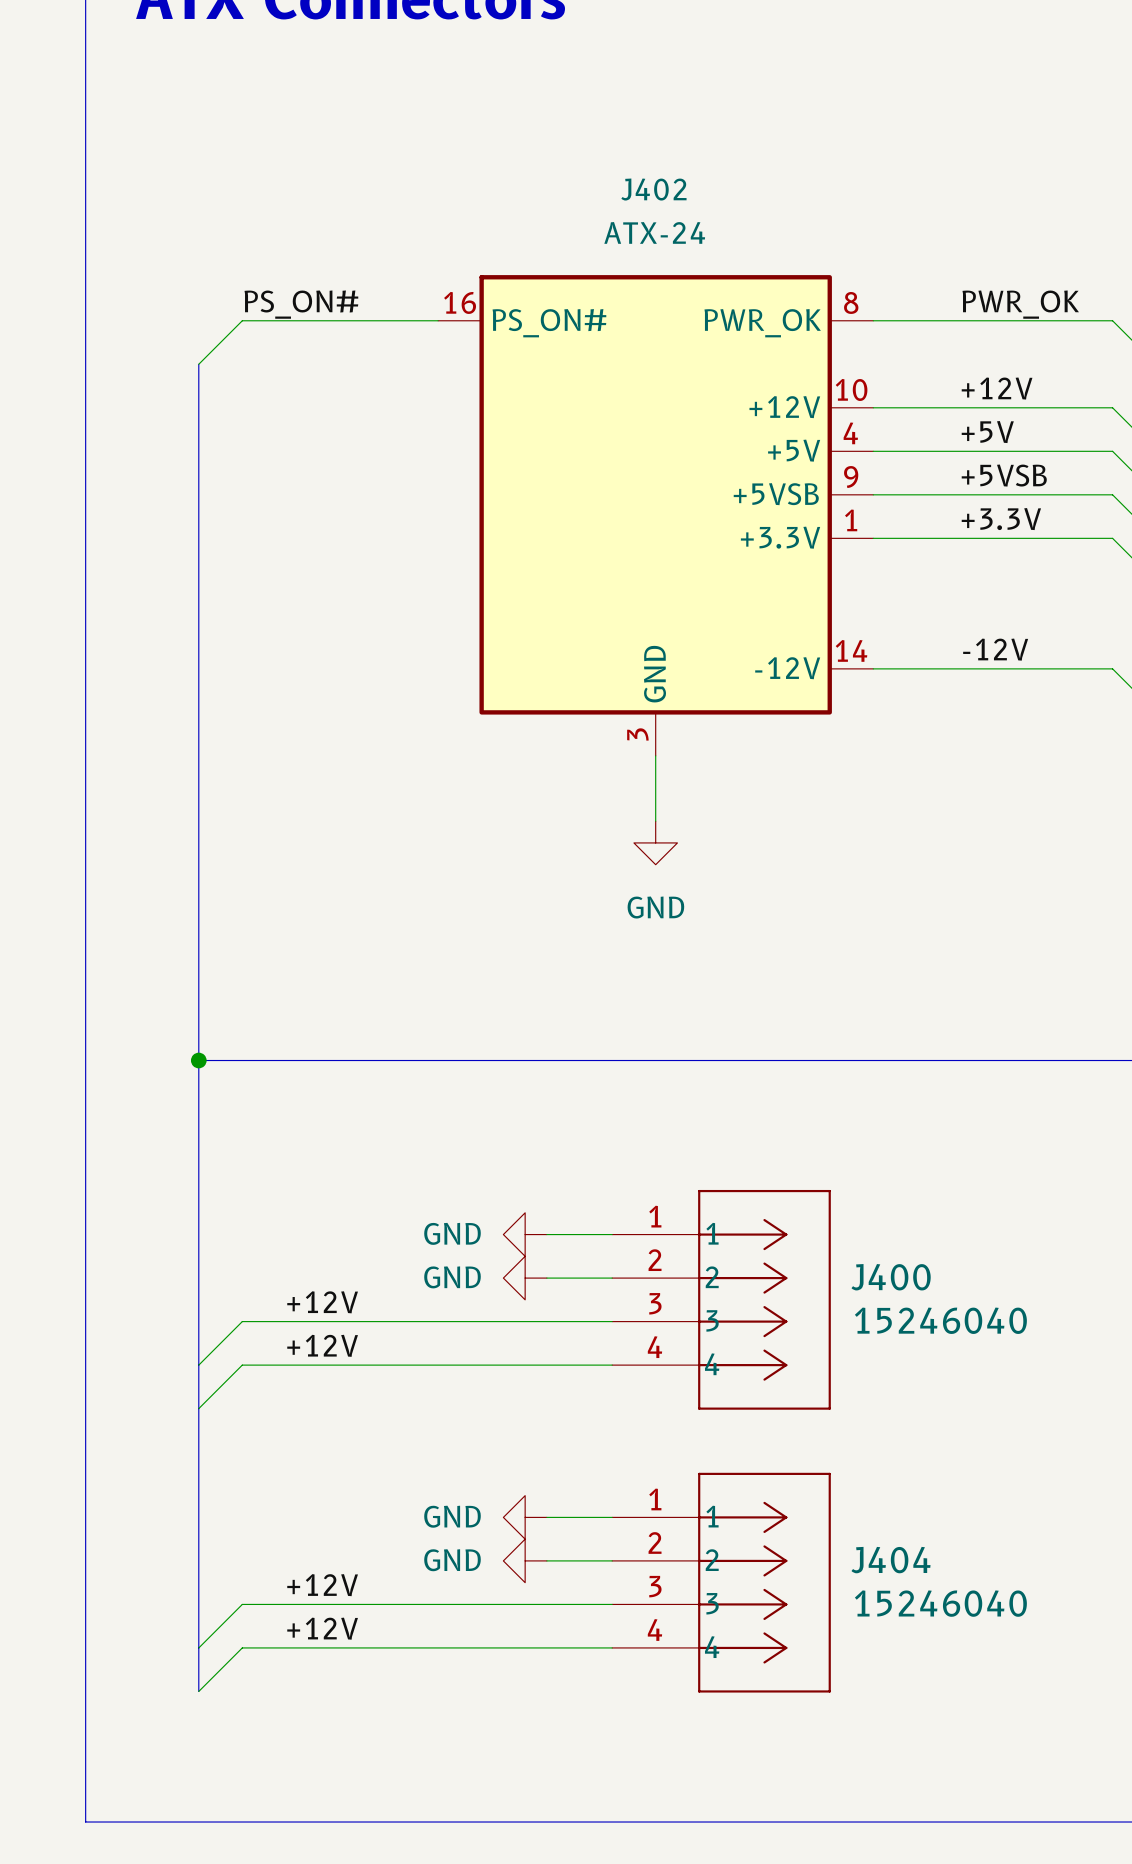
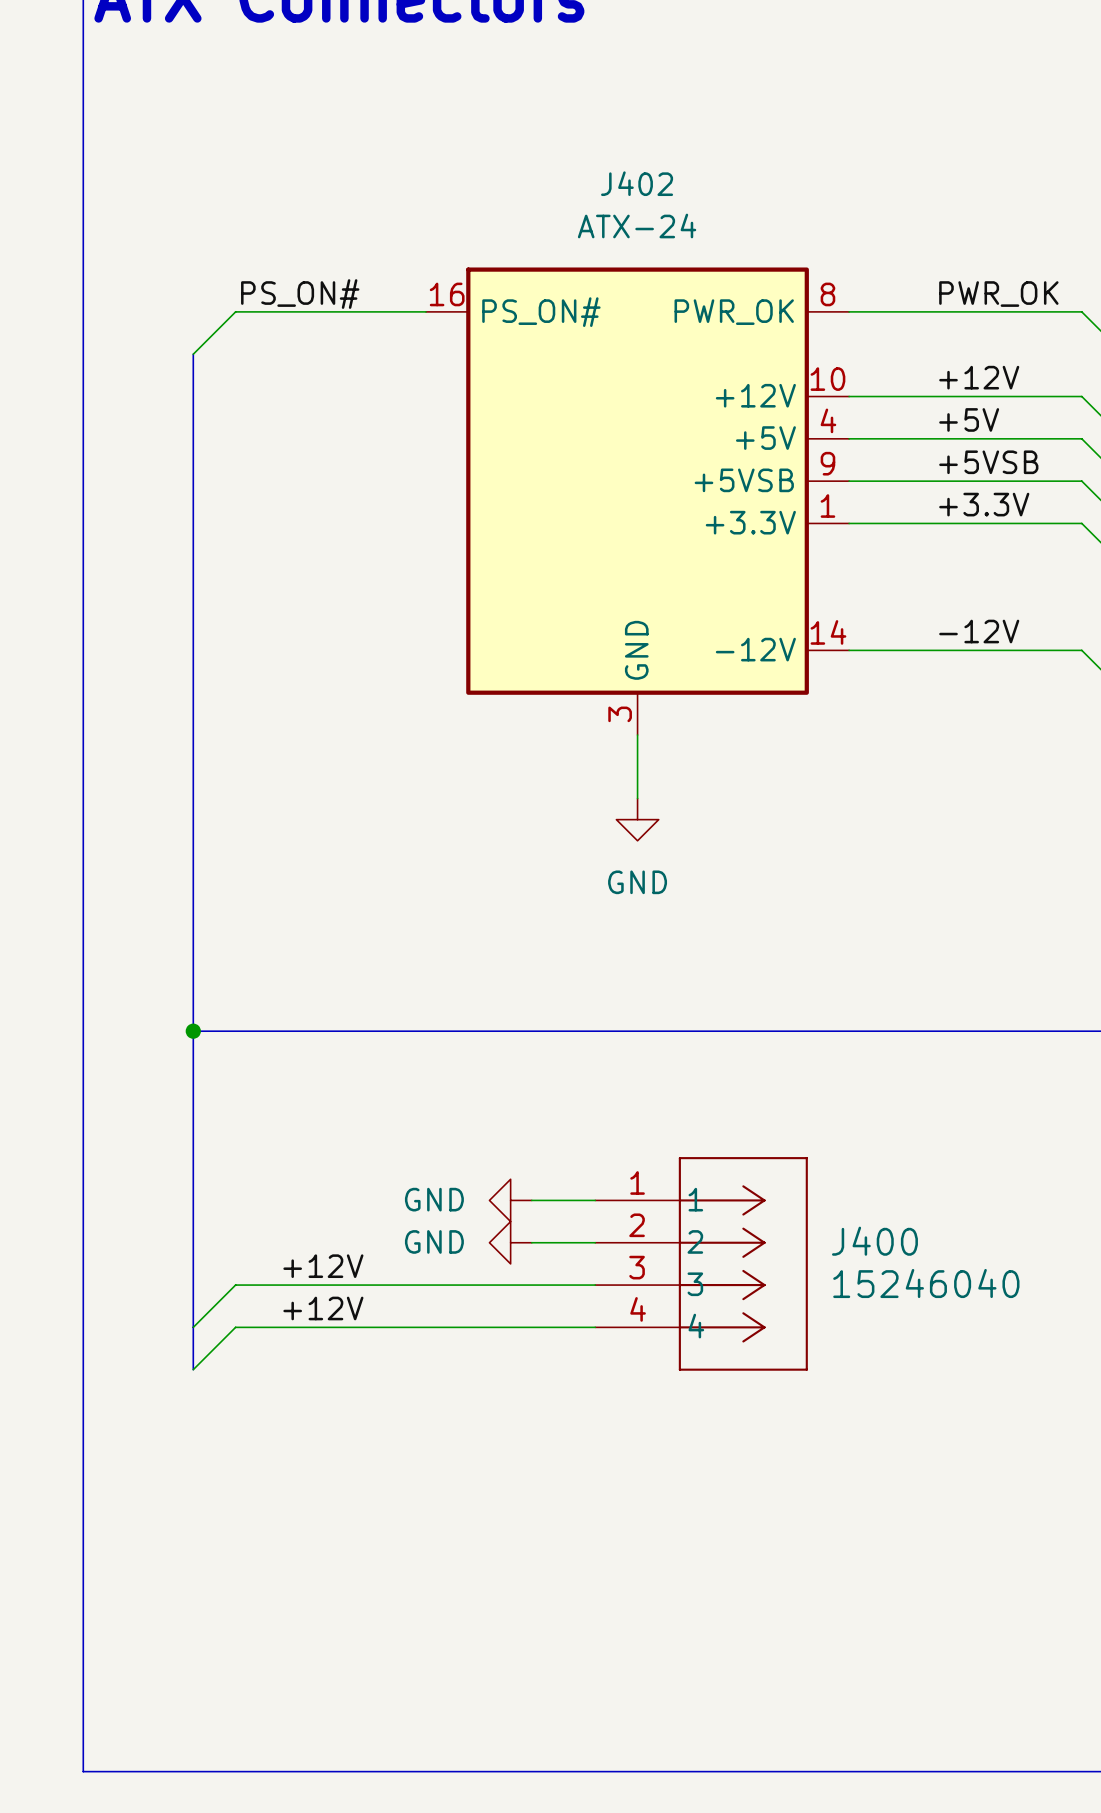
bus: (198, 1408) (198, 1691) -> none
power symbol: GND (525, 1517) -> none
wire: (546, 1517) (612, 1517) -> none
power symbol: GND (525, 1560) -> none
wire: (546, 1560) (612, 1560) -> none
J404: 15246040 (721, 1582) -> none
label: +12V (322, 1585) -> none
wire: (612, 1604) (242, 1604) (198, 1647) -> none
label: +12V (322, 1628) -> none
wire: (612, 1647) (242, 1647) (198, 1691) -> none

